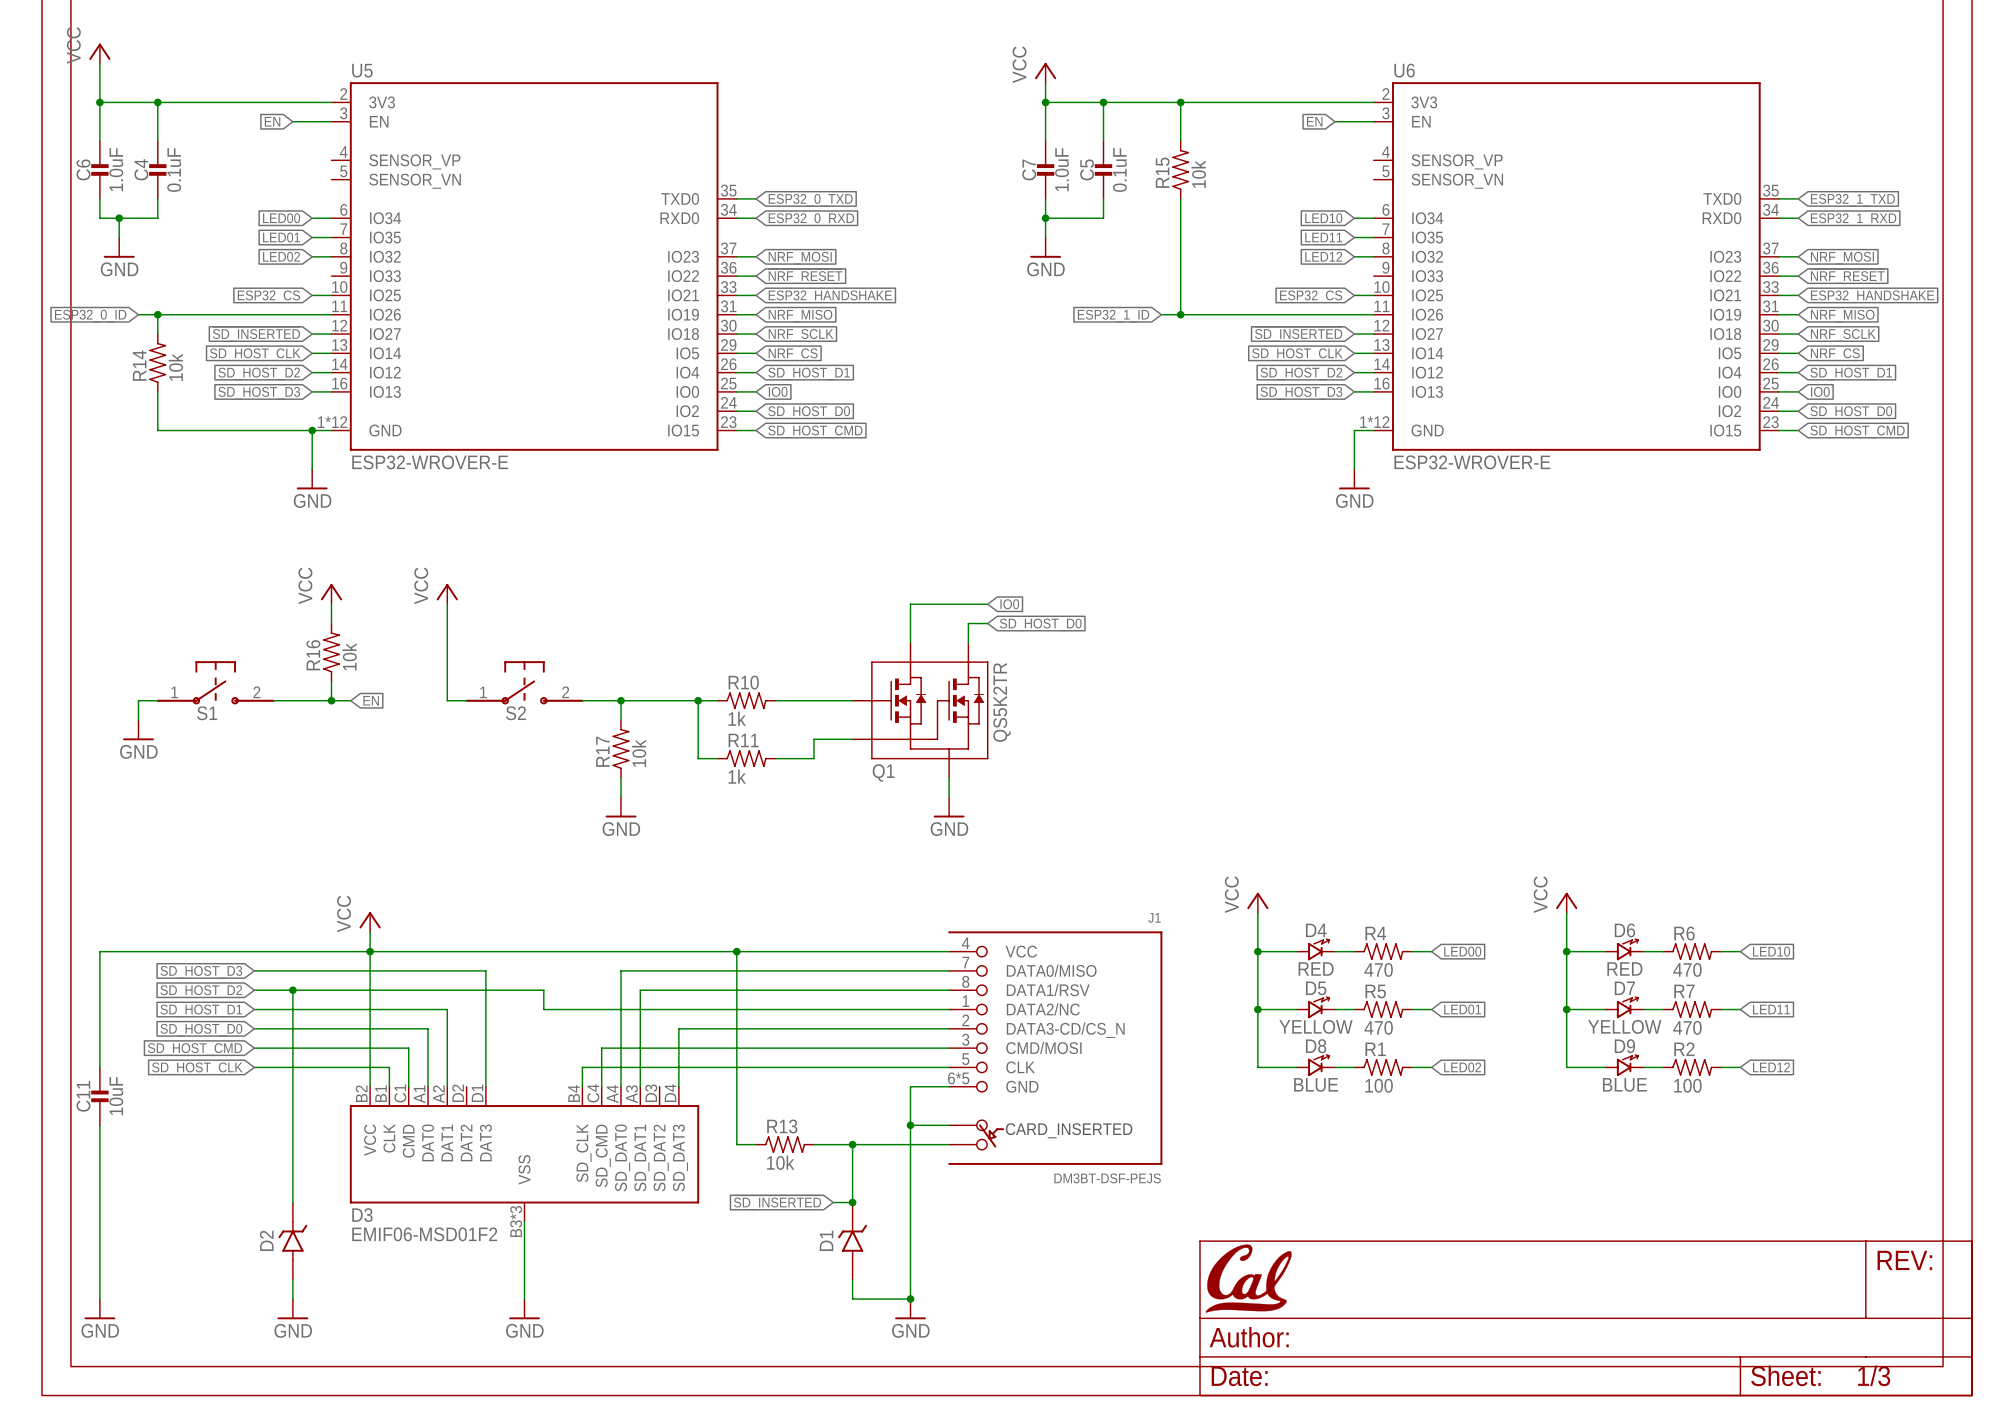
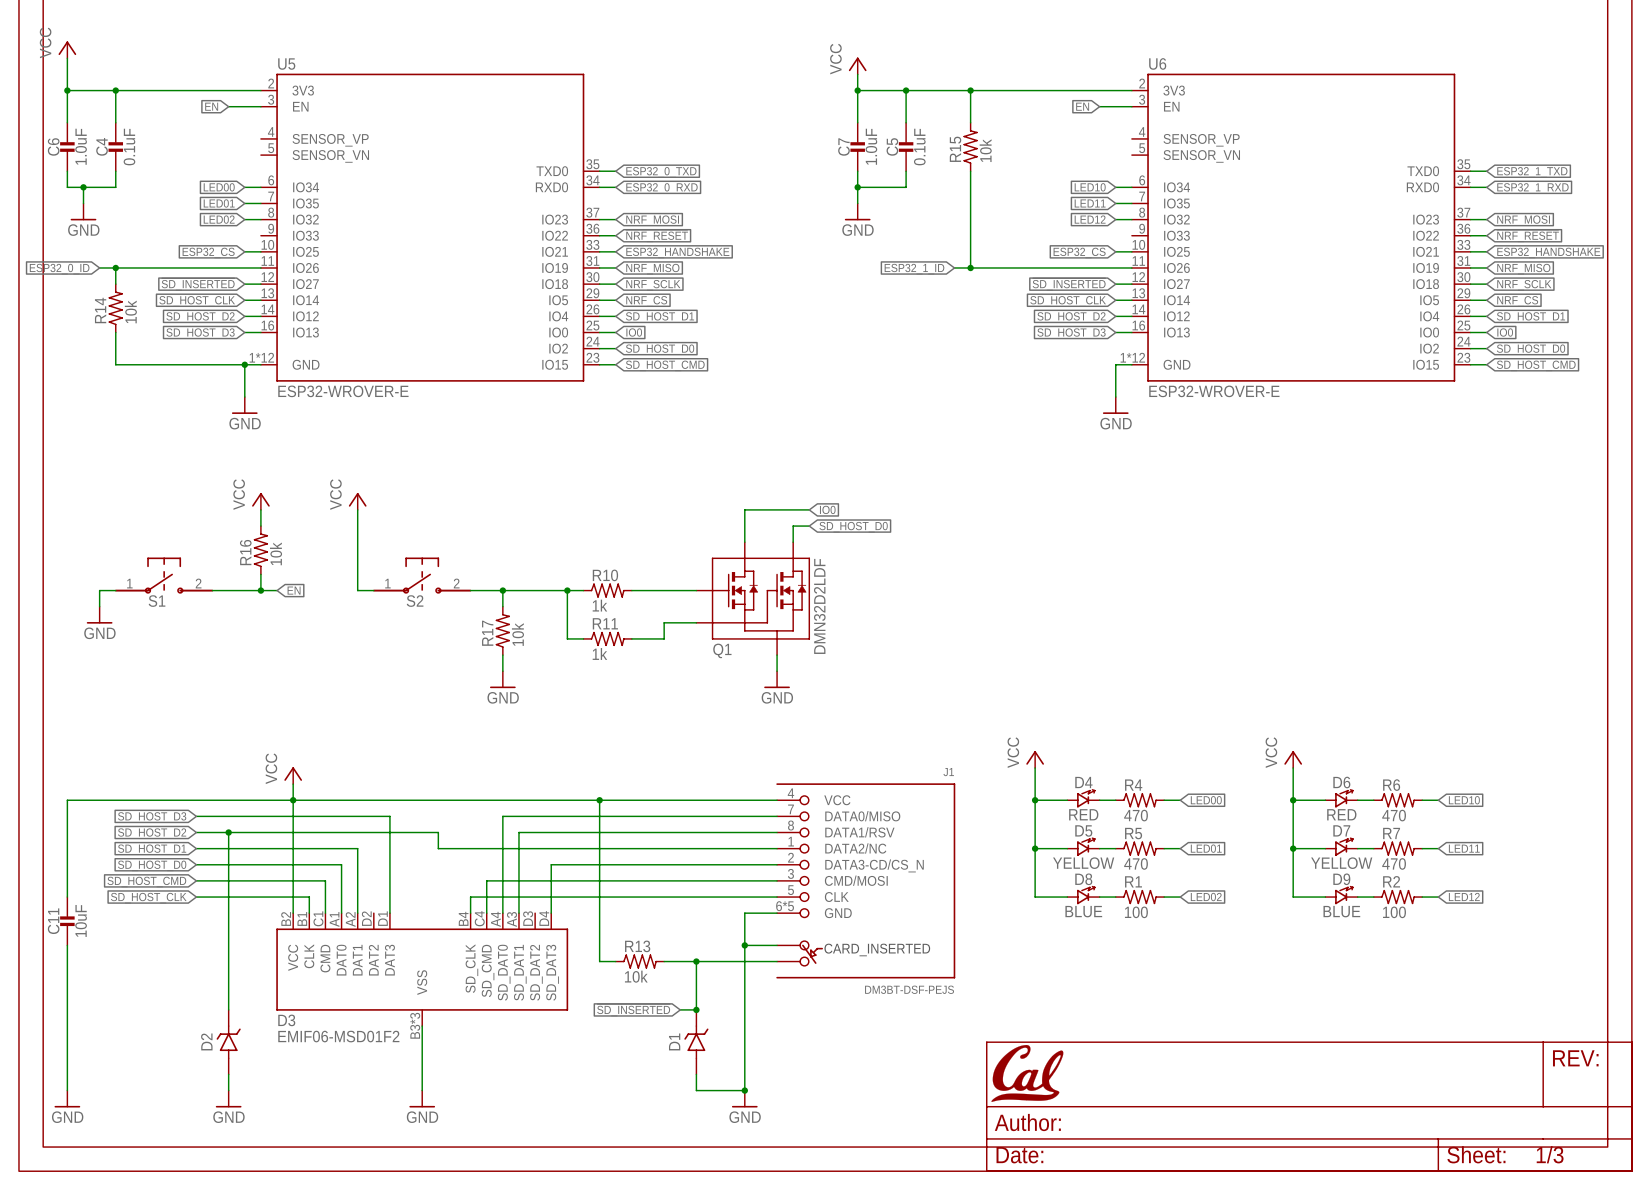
Q1 value: QS5K2TR (1001, 702) -> DMN32D2LDF (819, 606)

